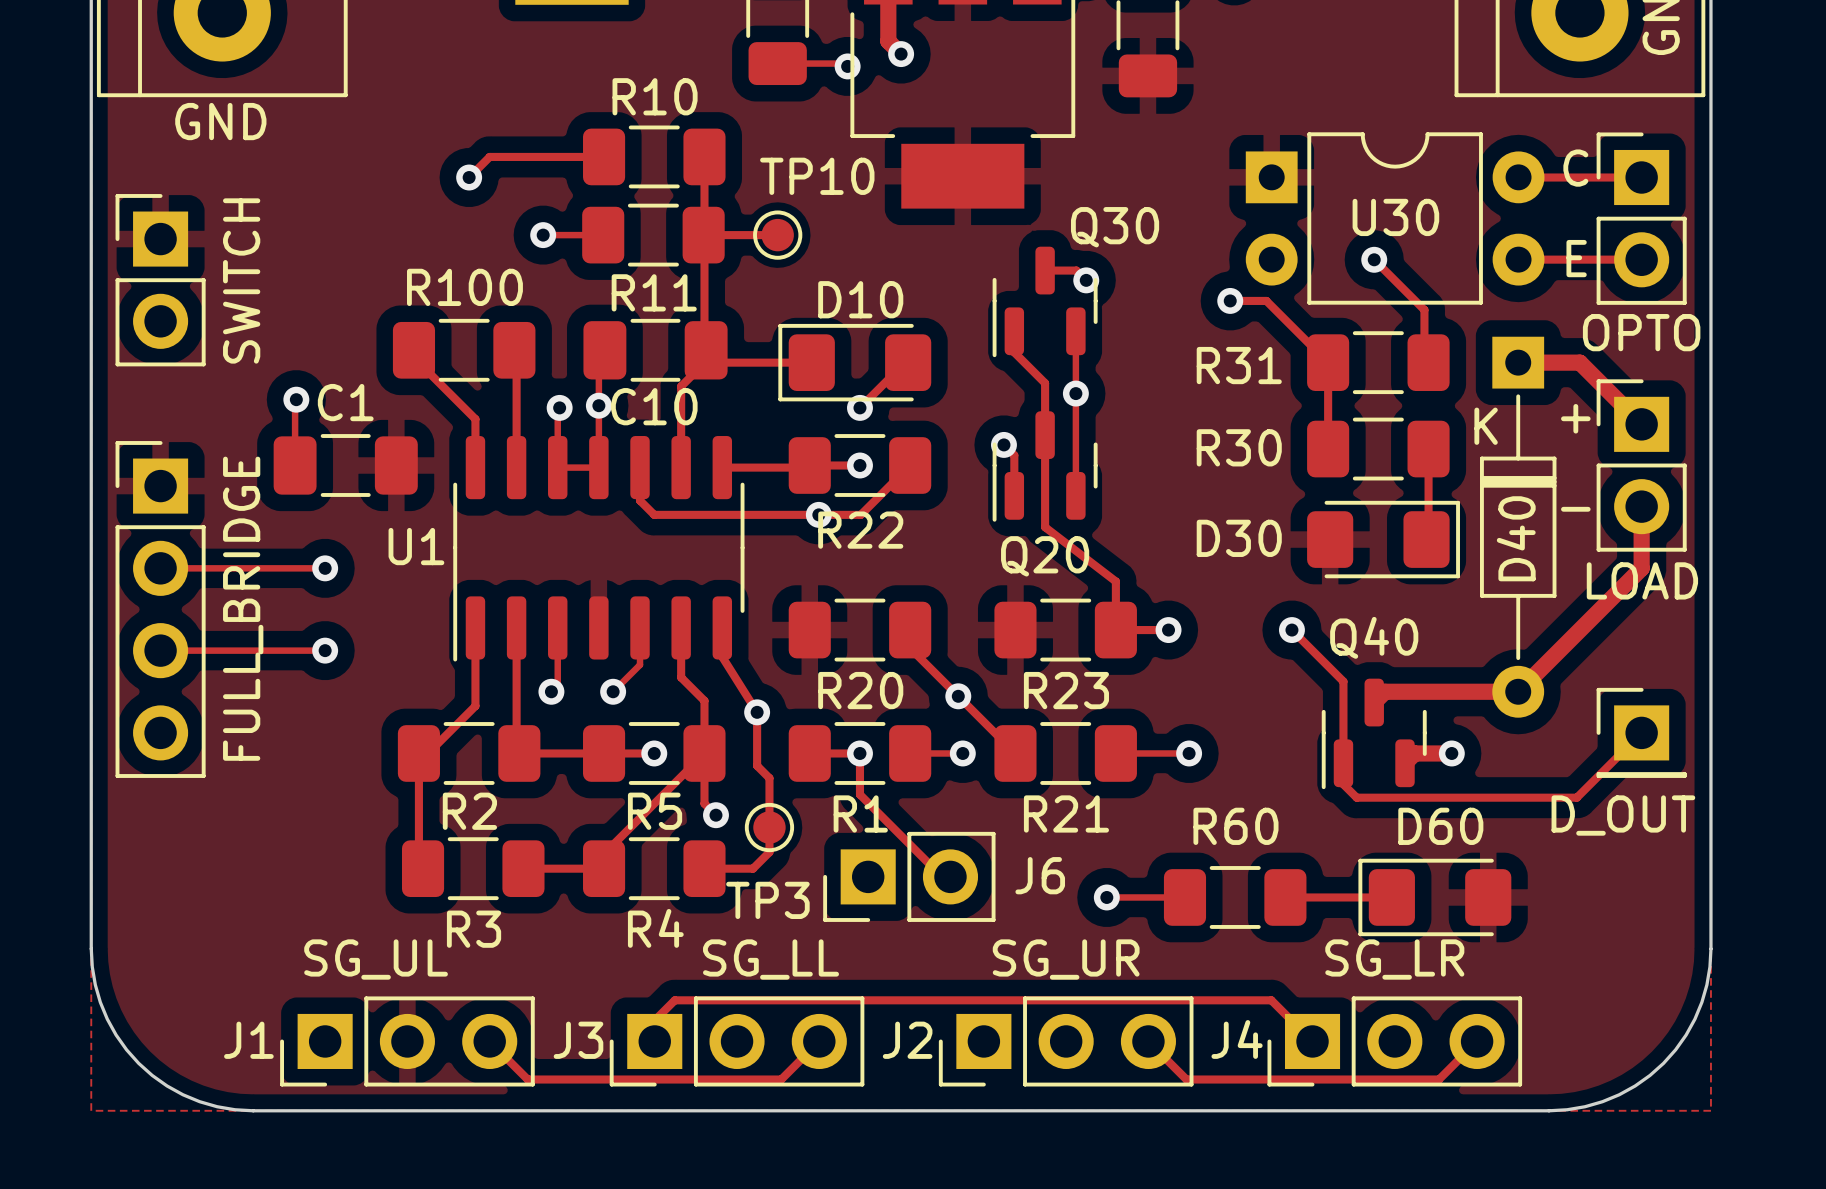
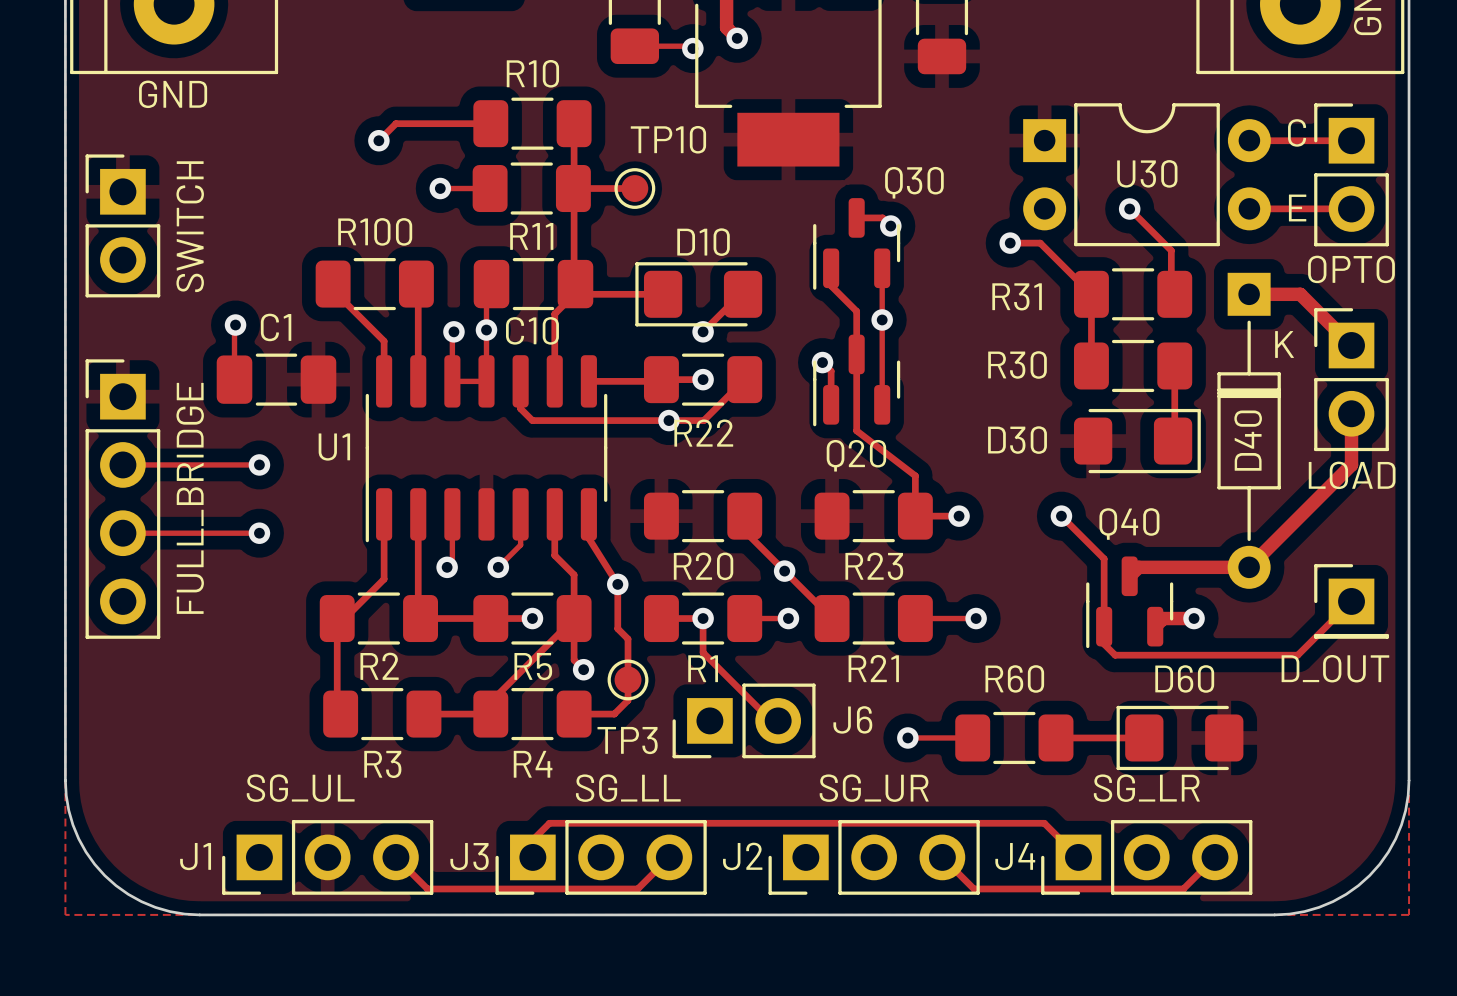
text: + (1575, 418) -> none
D40 text position: K (1486, 426) -> K (1284, 344)
text: - (1575, 509) -> none

